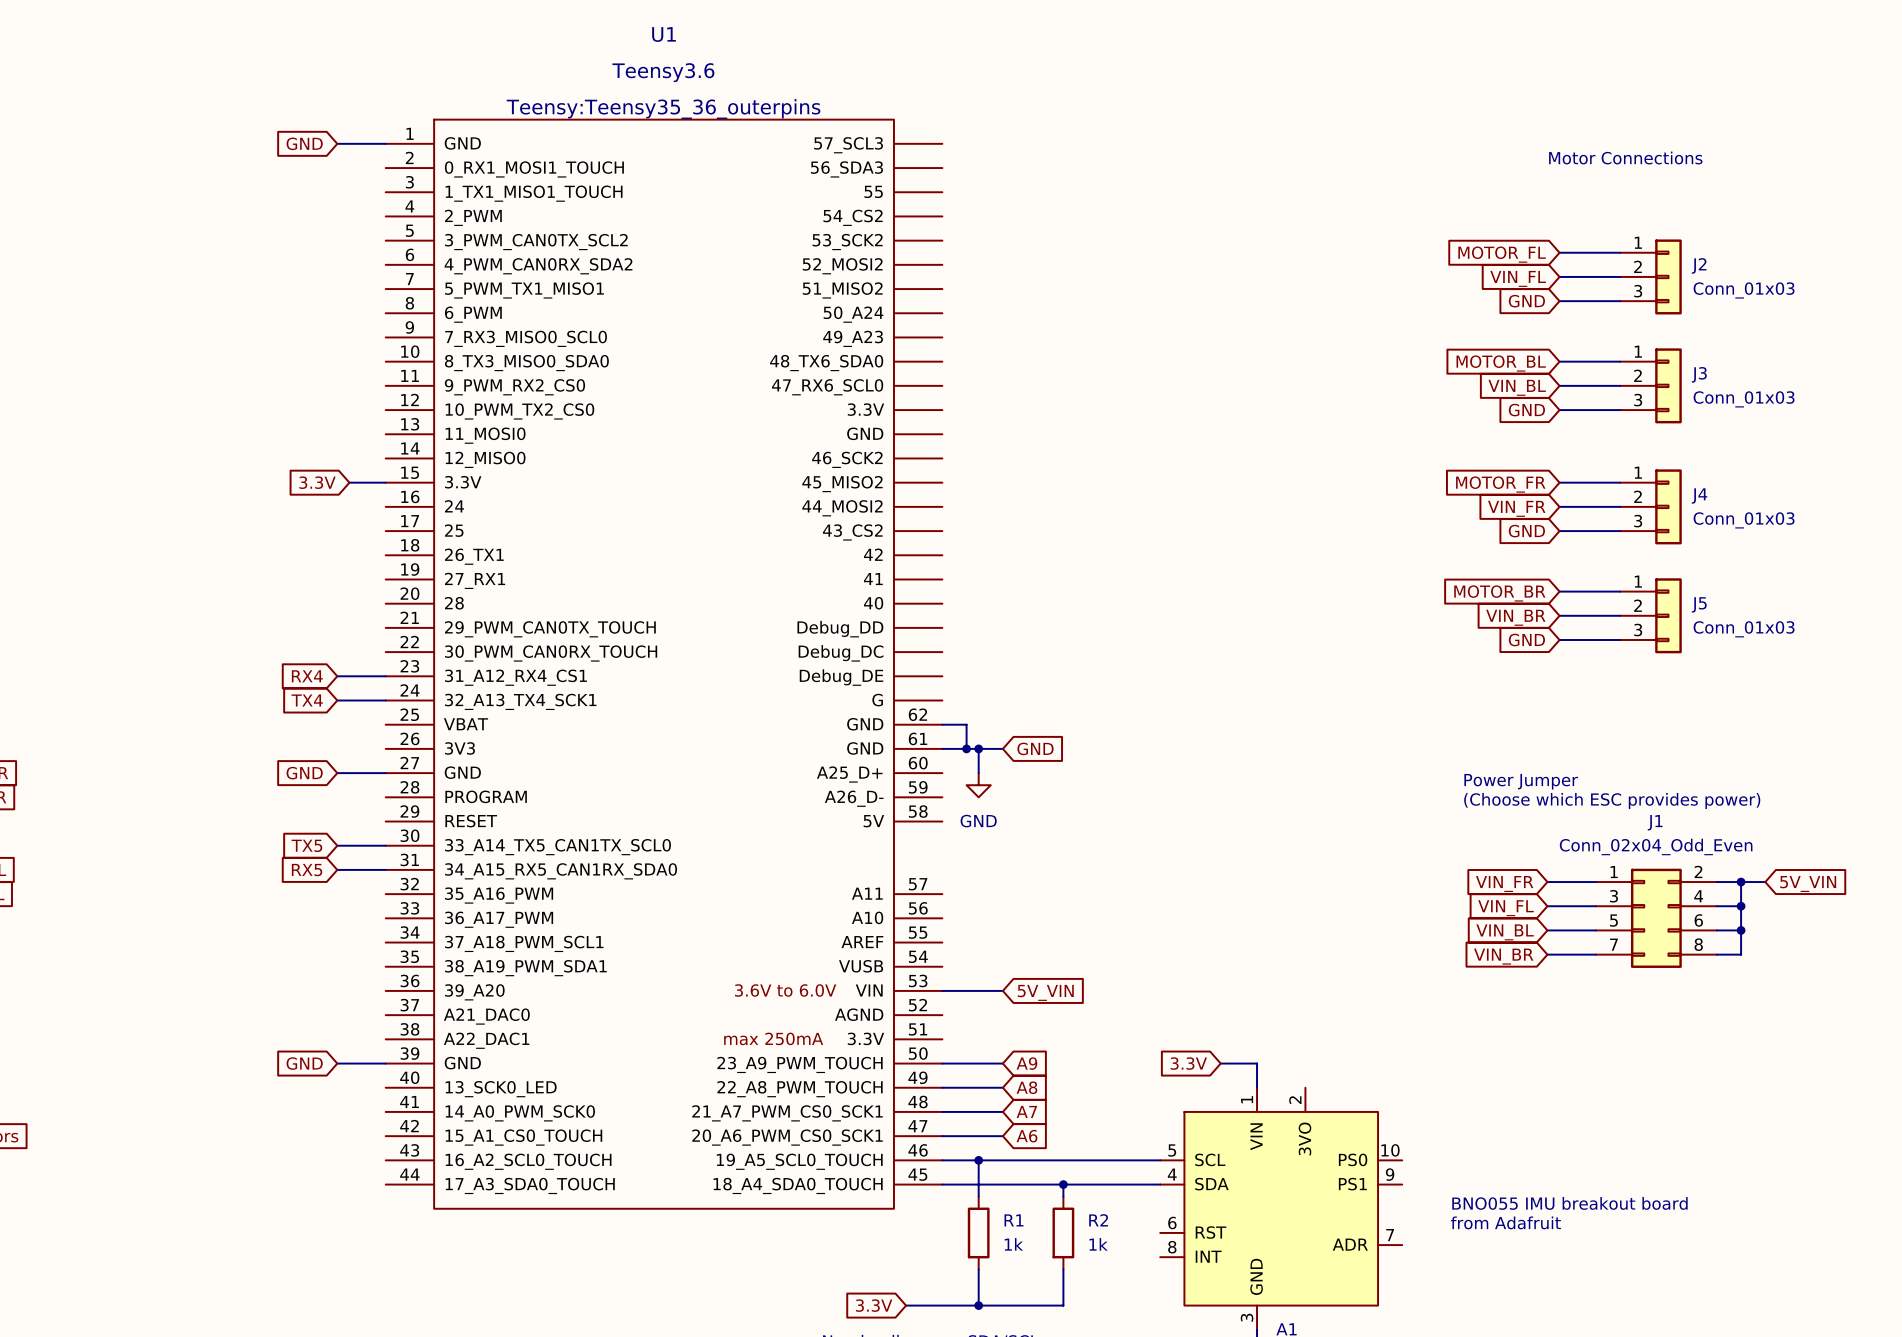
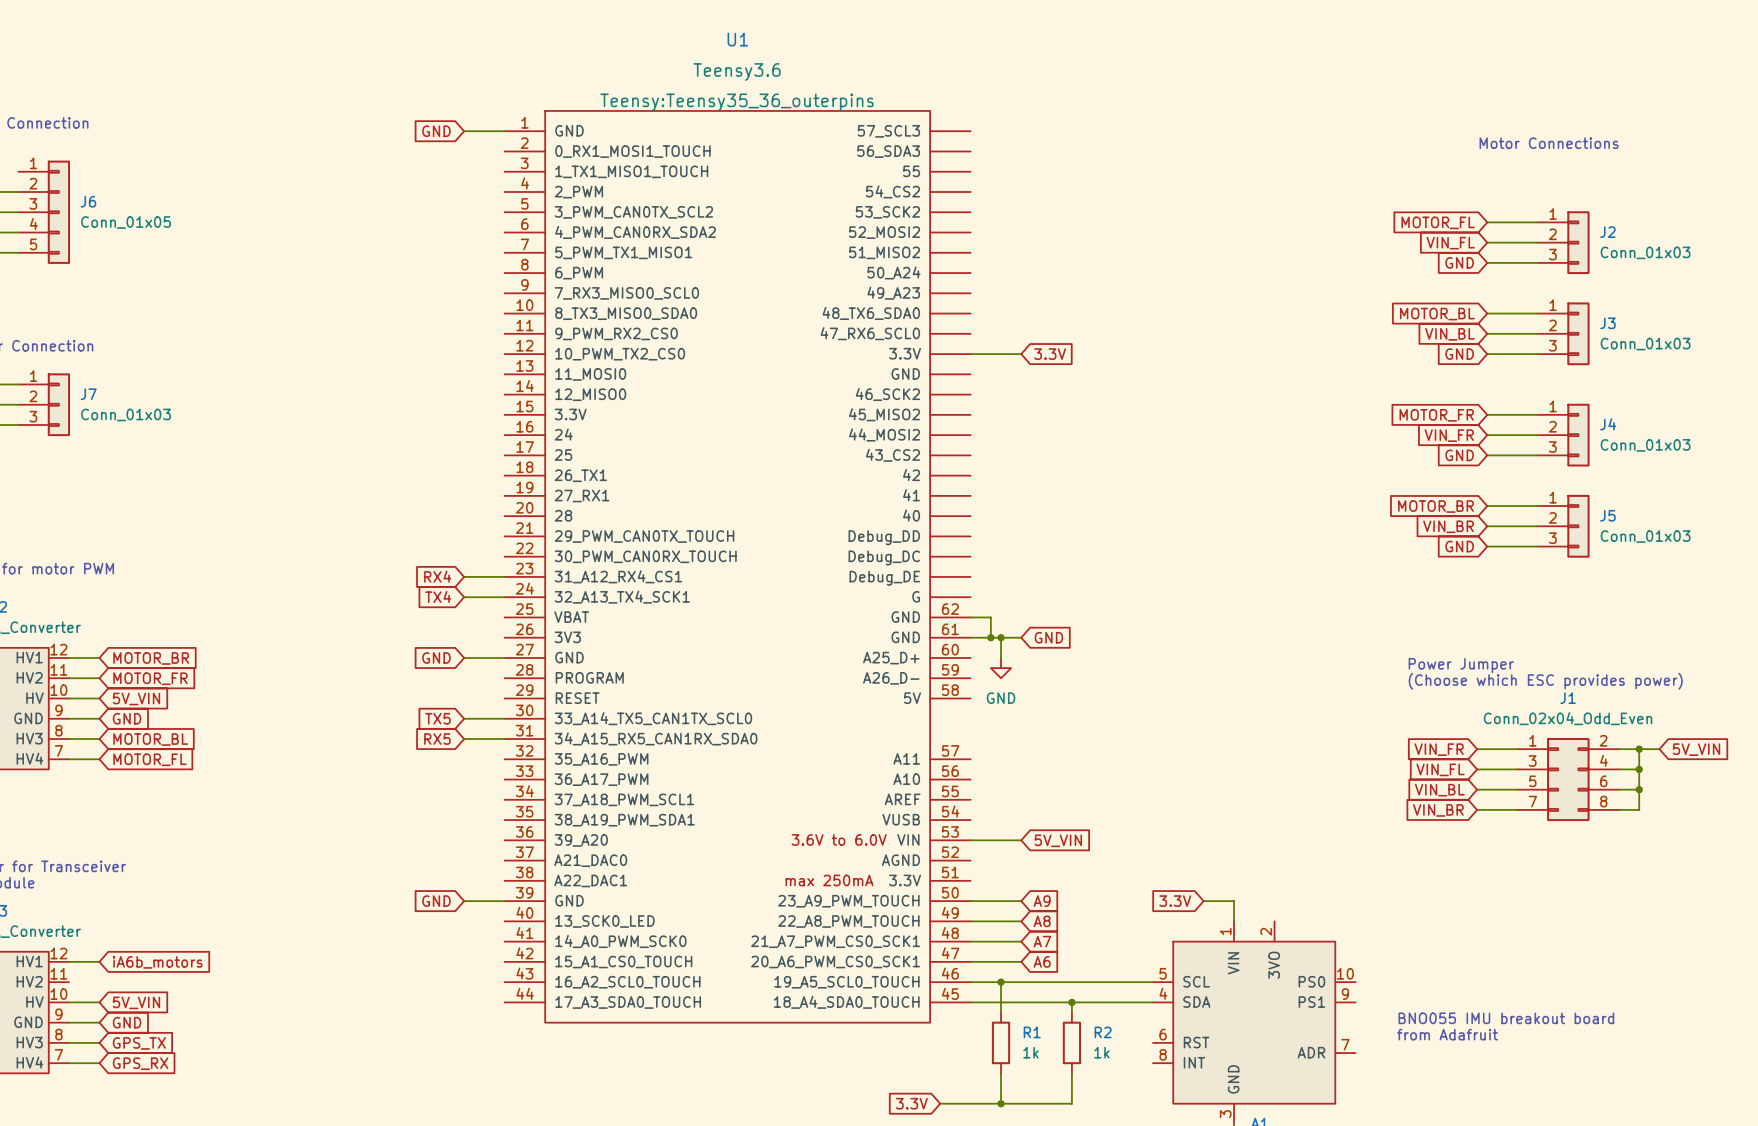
wire: none -> (970, 354) (1021, 354)
global label: none -> 3.3V (1050, 354)
global label: 3.3V (317, 482) -> none
wire: (349, 482) (385, 482) -> none

